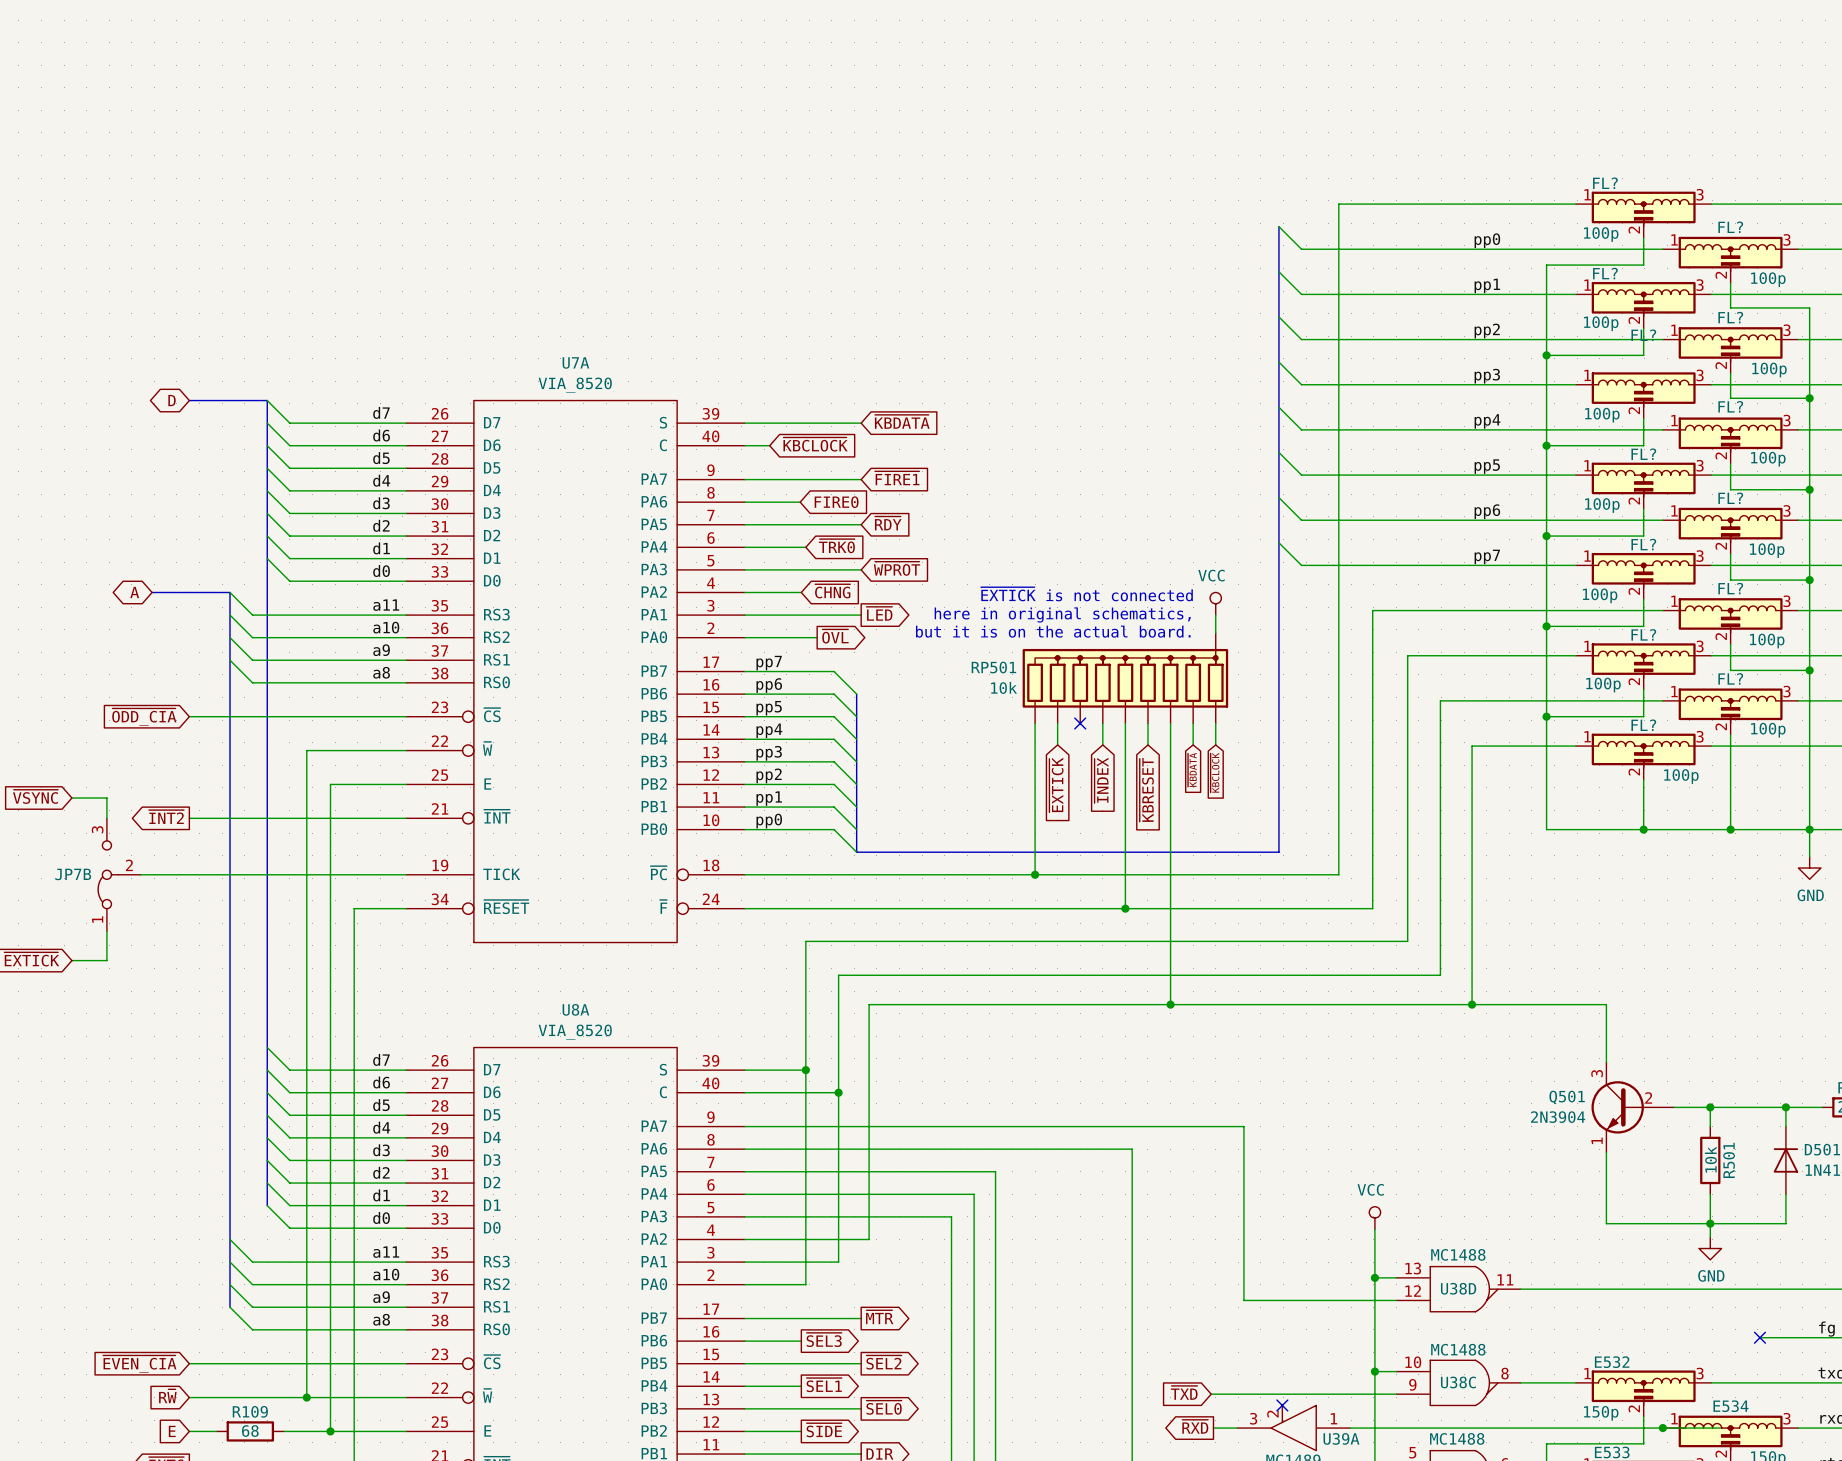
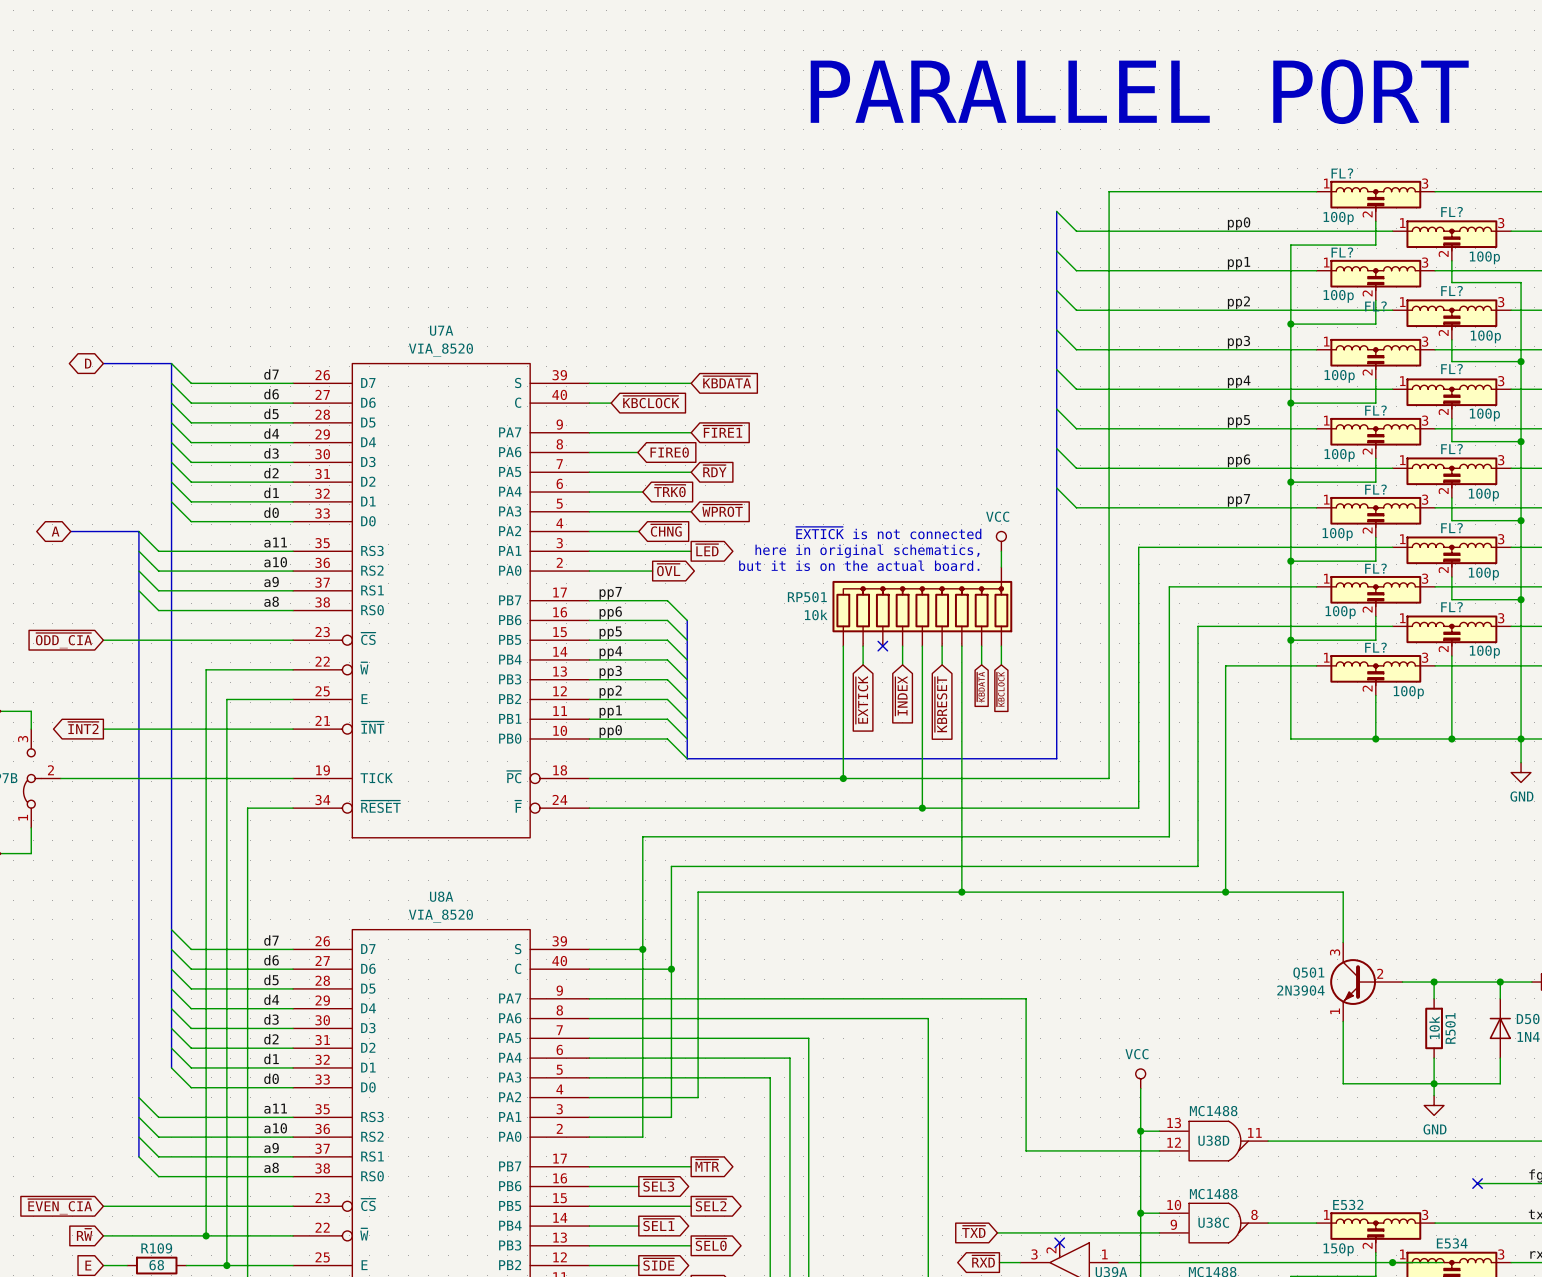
text: none -> PARALLEL PORT (1139, 91)

